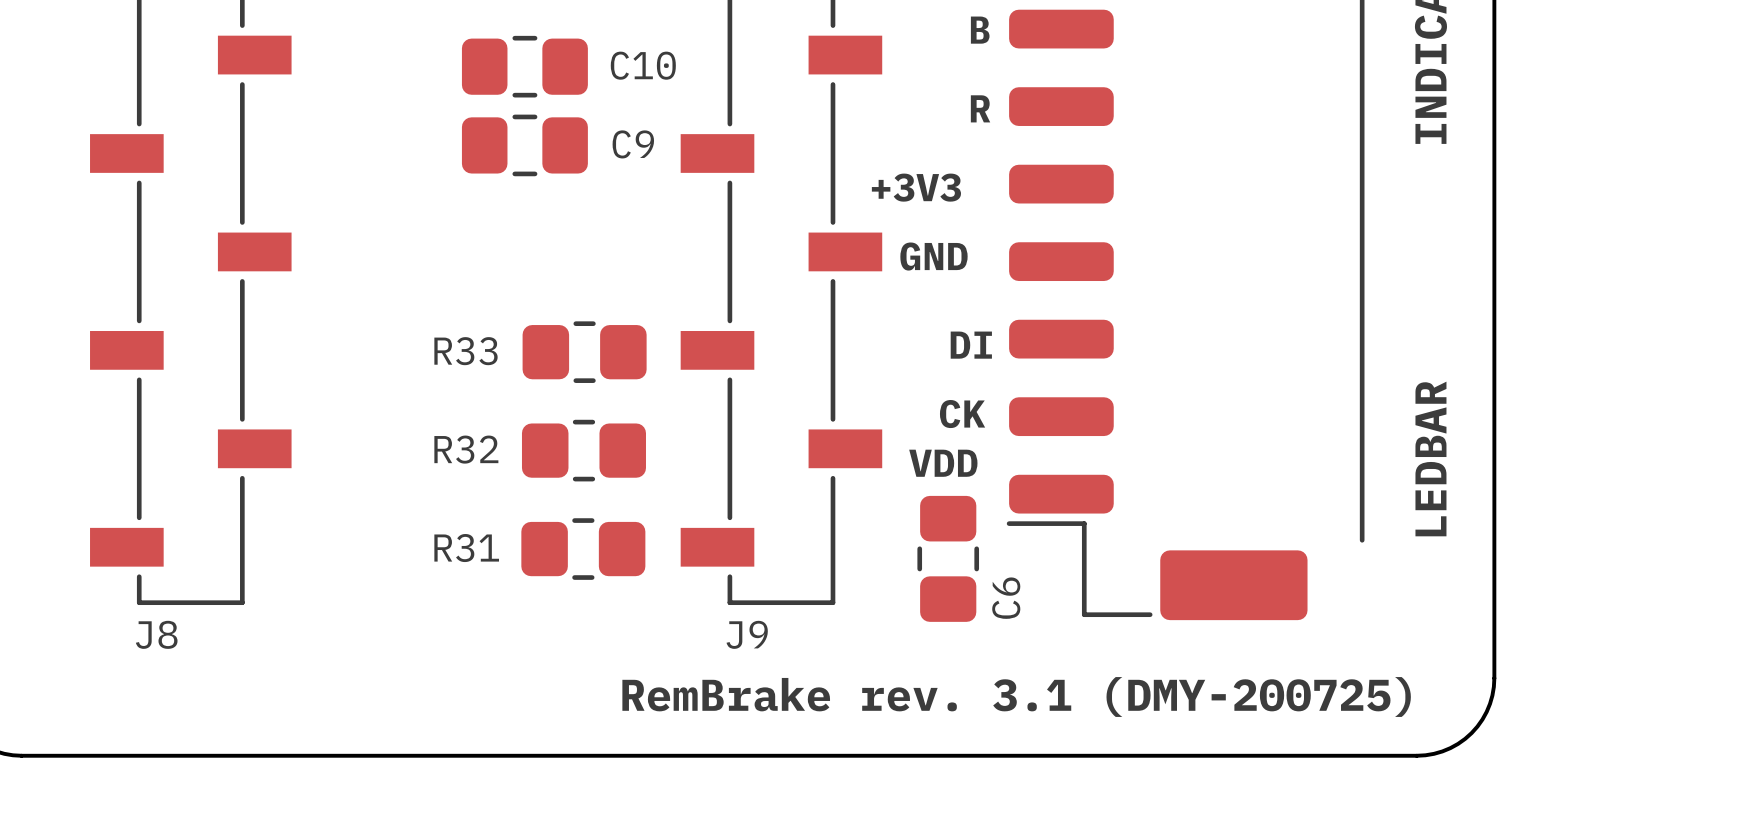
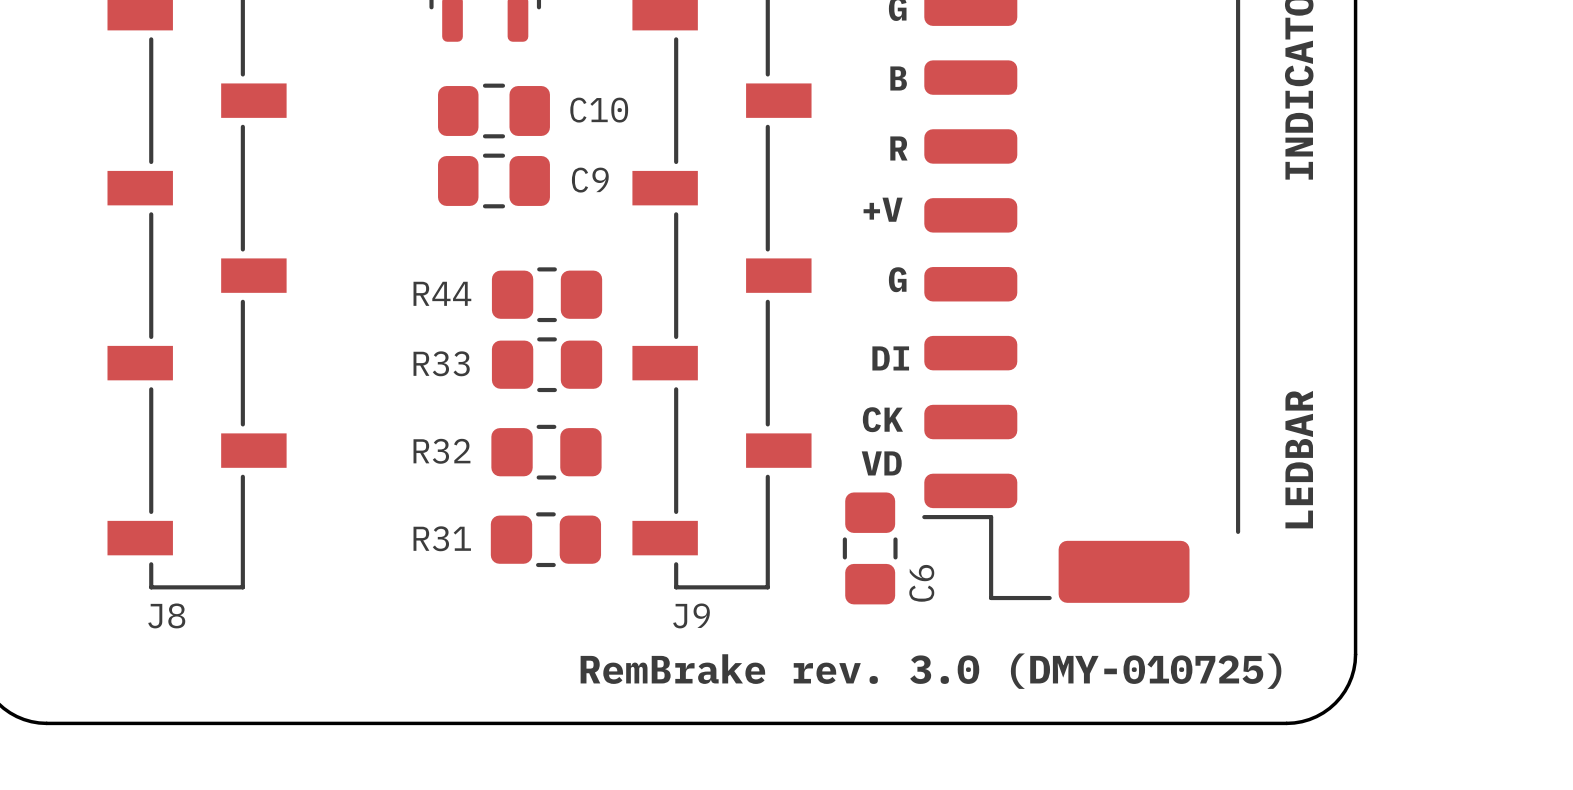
text: +3V3 (916, 187) -> +V (883, 209)
text: GND (933, 256) -> none
text: none -> G (897, 279)
R44: none -> (547, 294)
text: VDD (943, 463) -> VD (881, 463)
text: RemBrake rev. 3.1 (DMY-200725) (1016, 697) -> RemBrake rev. 3.0 (DMY-010725) (930, 671)

